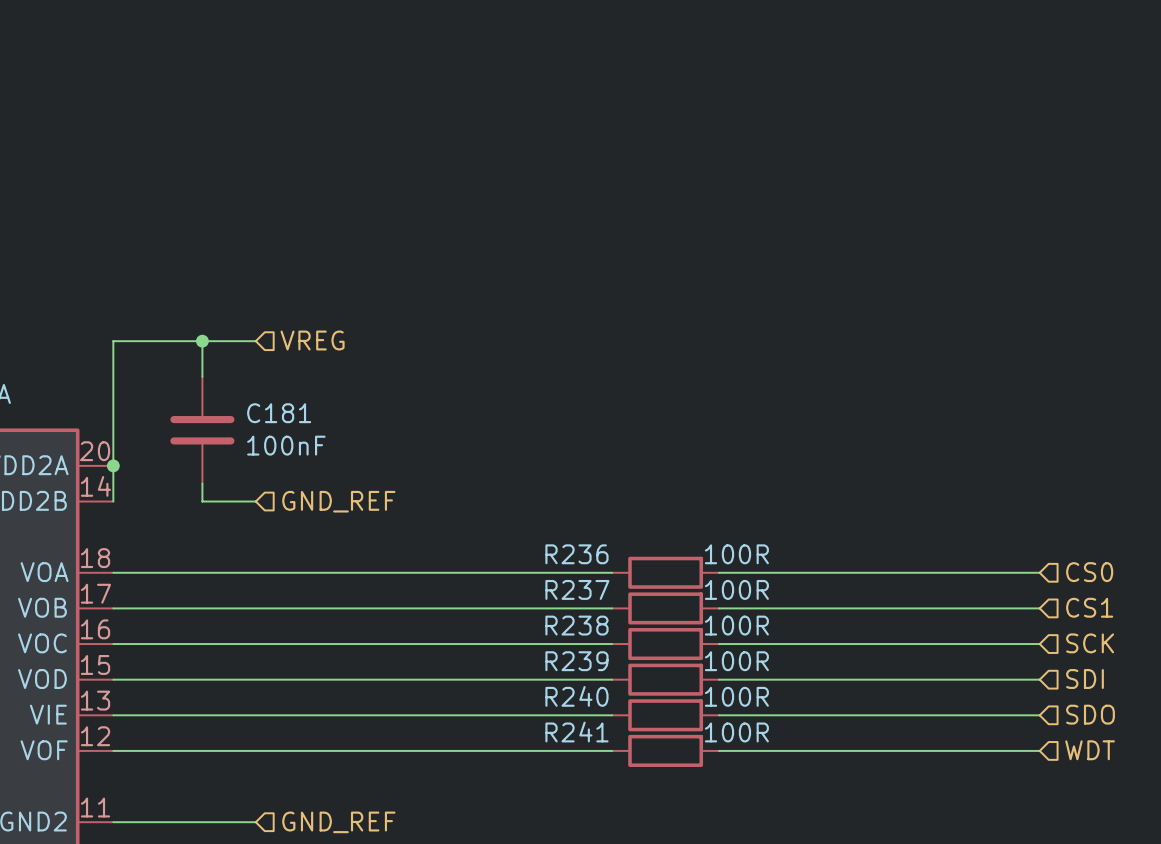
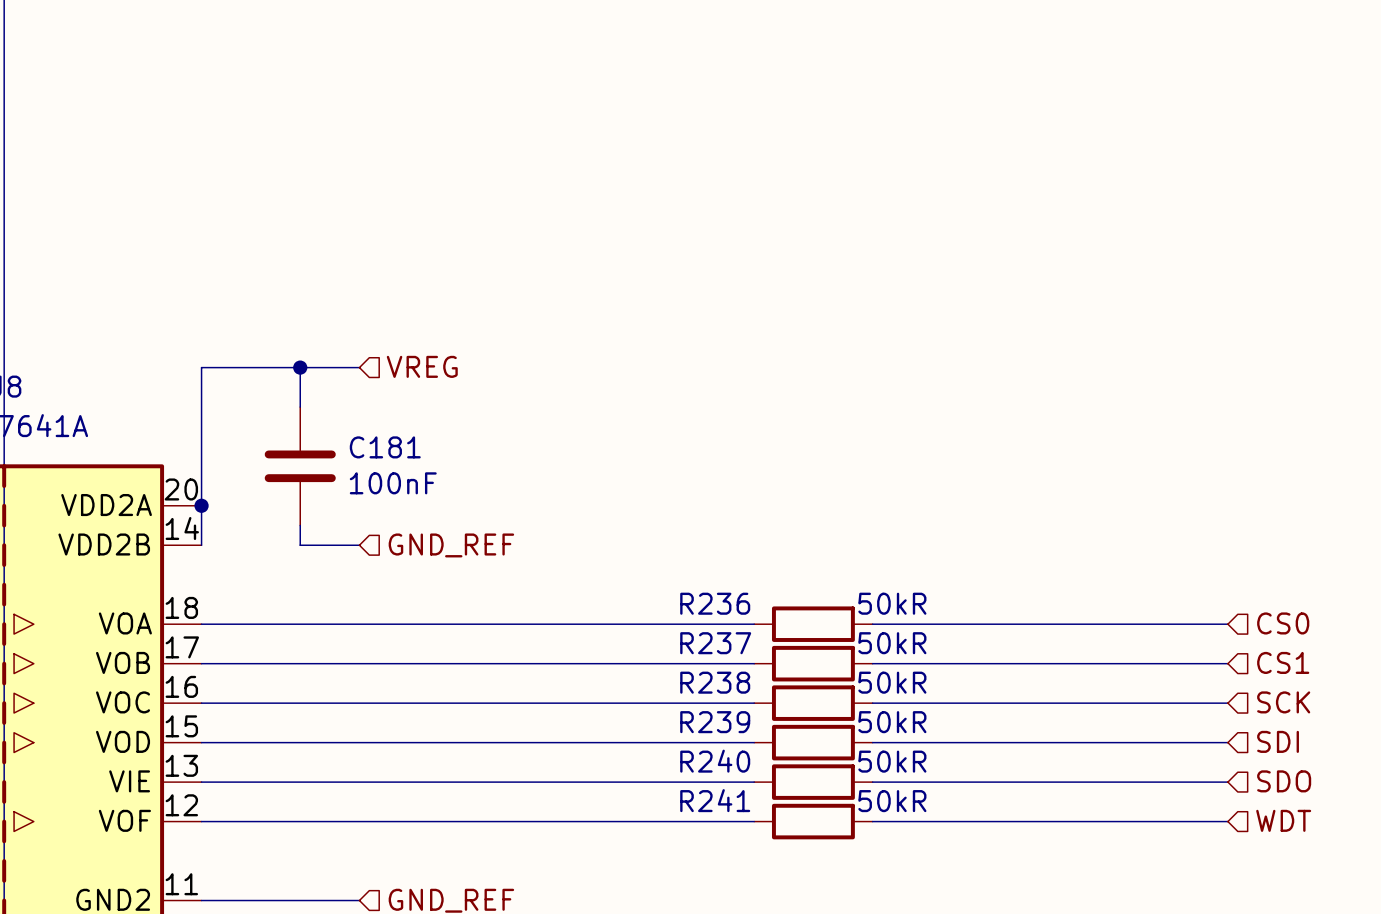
R236 value: 100R (736, 554) -> 50kR (892, 603)
R237 value: 100R (736, 589) -> 50kR (892, 643)
R238 value: 100R (736, 625) -> 50kR (892, 682)
R239 value: 100R (736, 661) -> 50kR (892, 722)
R240 value: 100R (736, 696) -> 50kR (892, 761)
R241 value: 100R (736, 732) -> 50kR (892, 801)

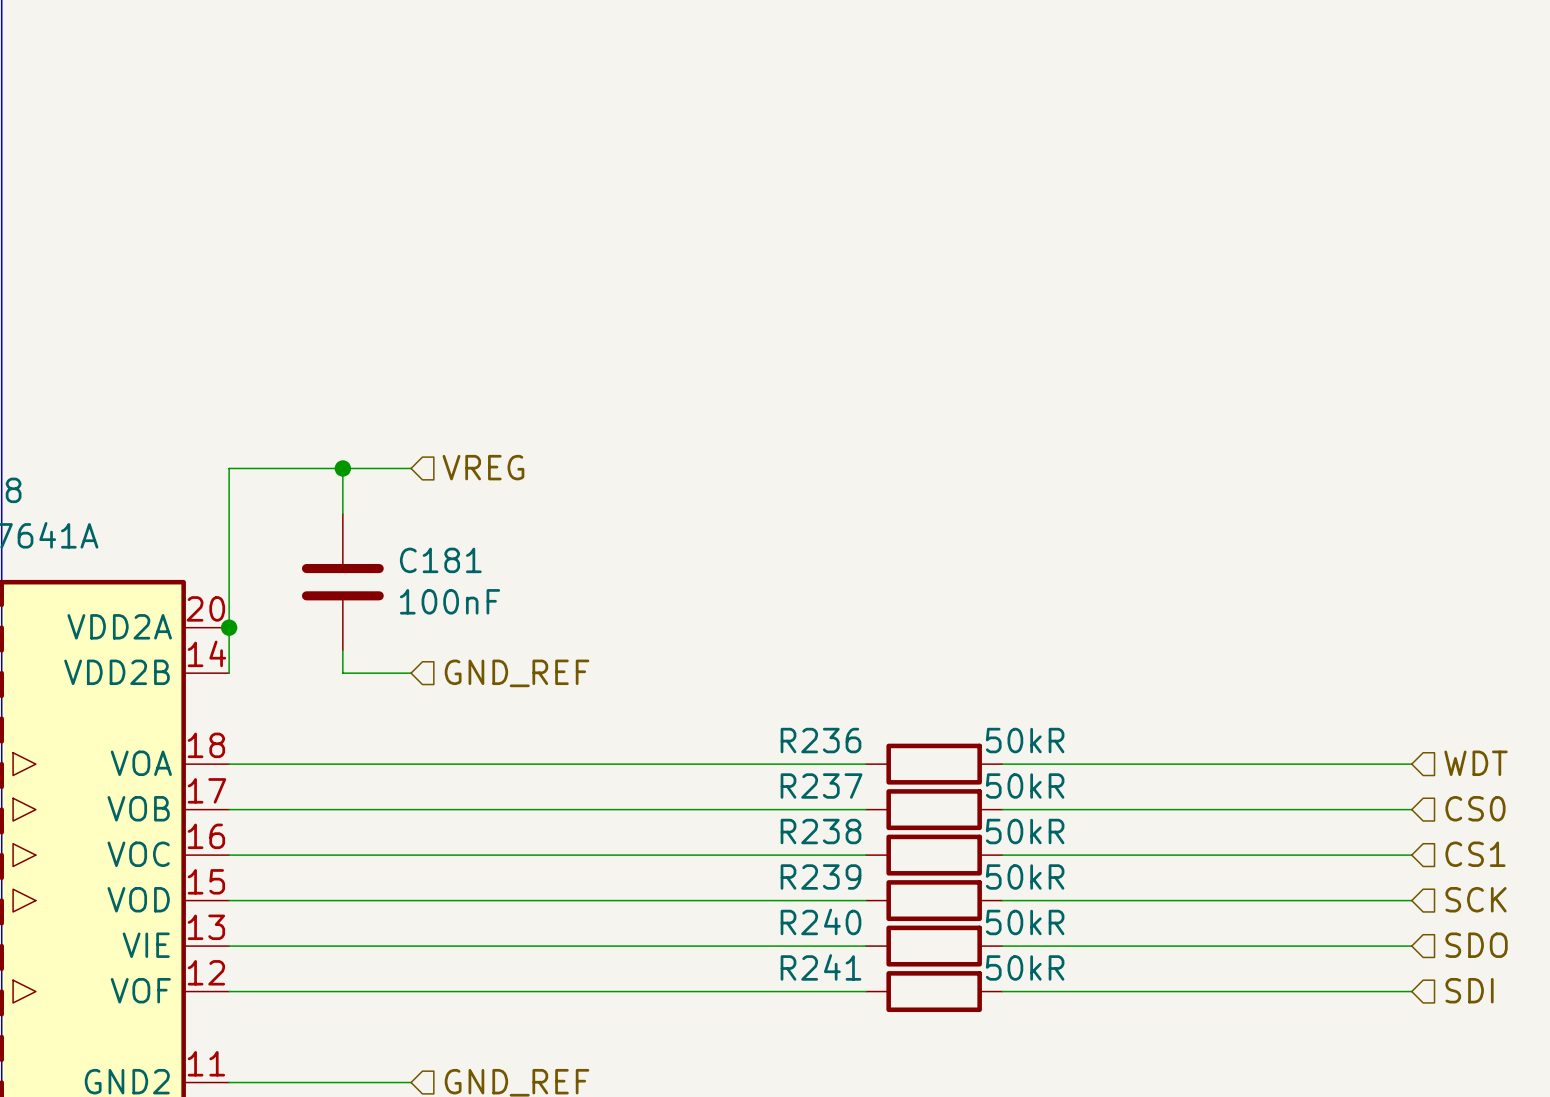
hierarchical label: CS0 (1283, 623) -> WDT (1476, 763)
hierarchical label: CS1 (1283, 662) -> CS0 (1475, 808)
hierarchical label: SCK (1283, 702) -> CS1 (1475, 854)
hierarchical label: SDI (1278, 741) -> SCK (1476, 899)
hierarchical label: WDT (1283, 820) -> SDI (1469, 990)

